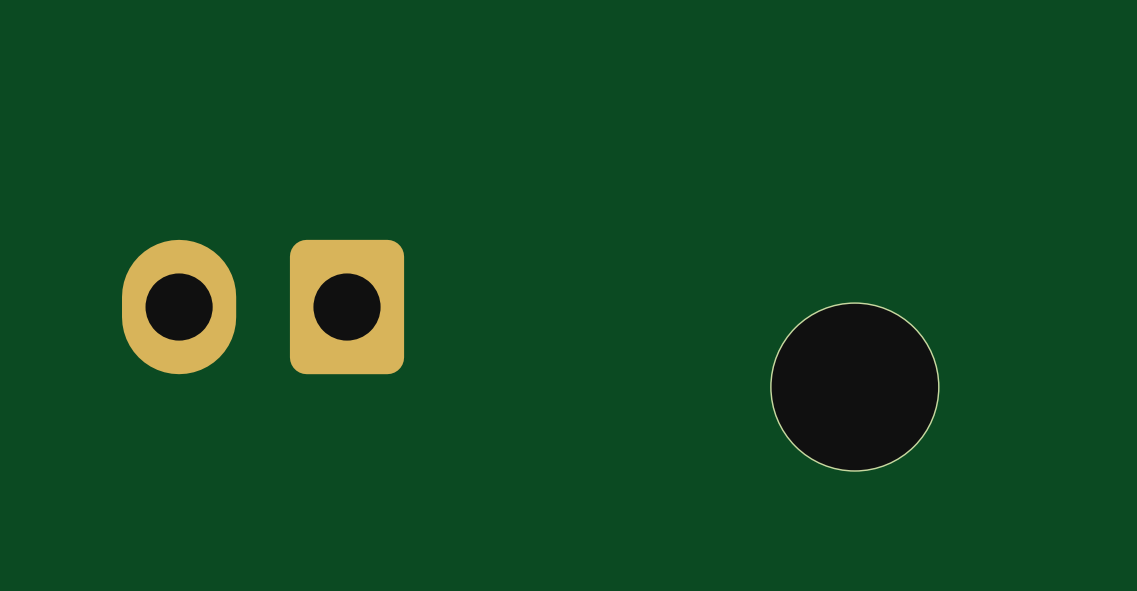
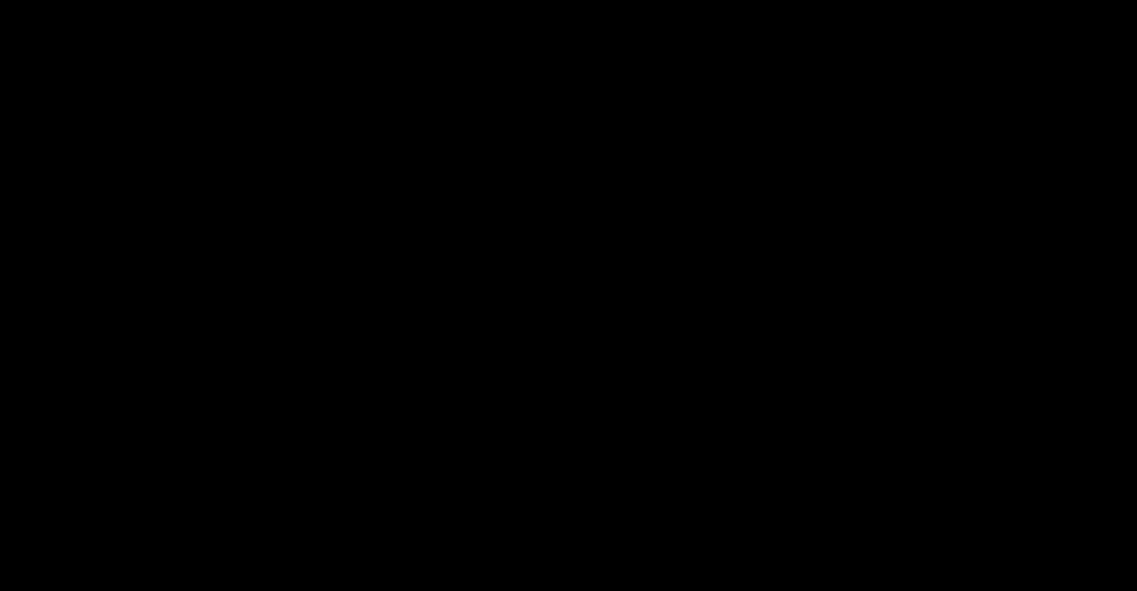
part: (263, 307) -> none
part: (854, 387) -> none

